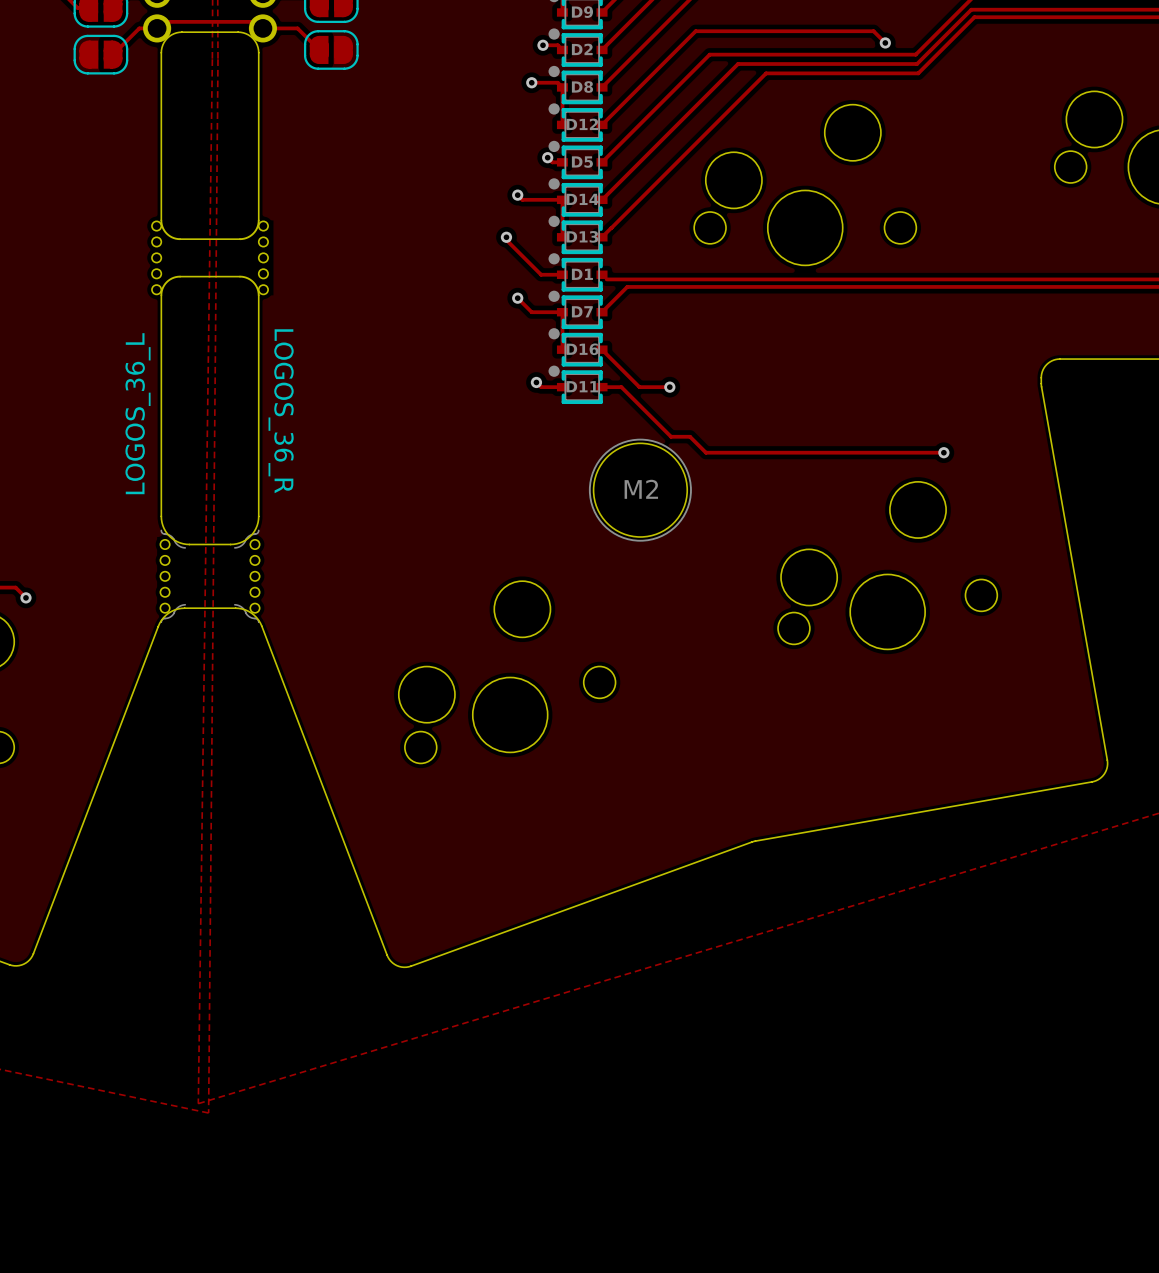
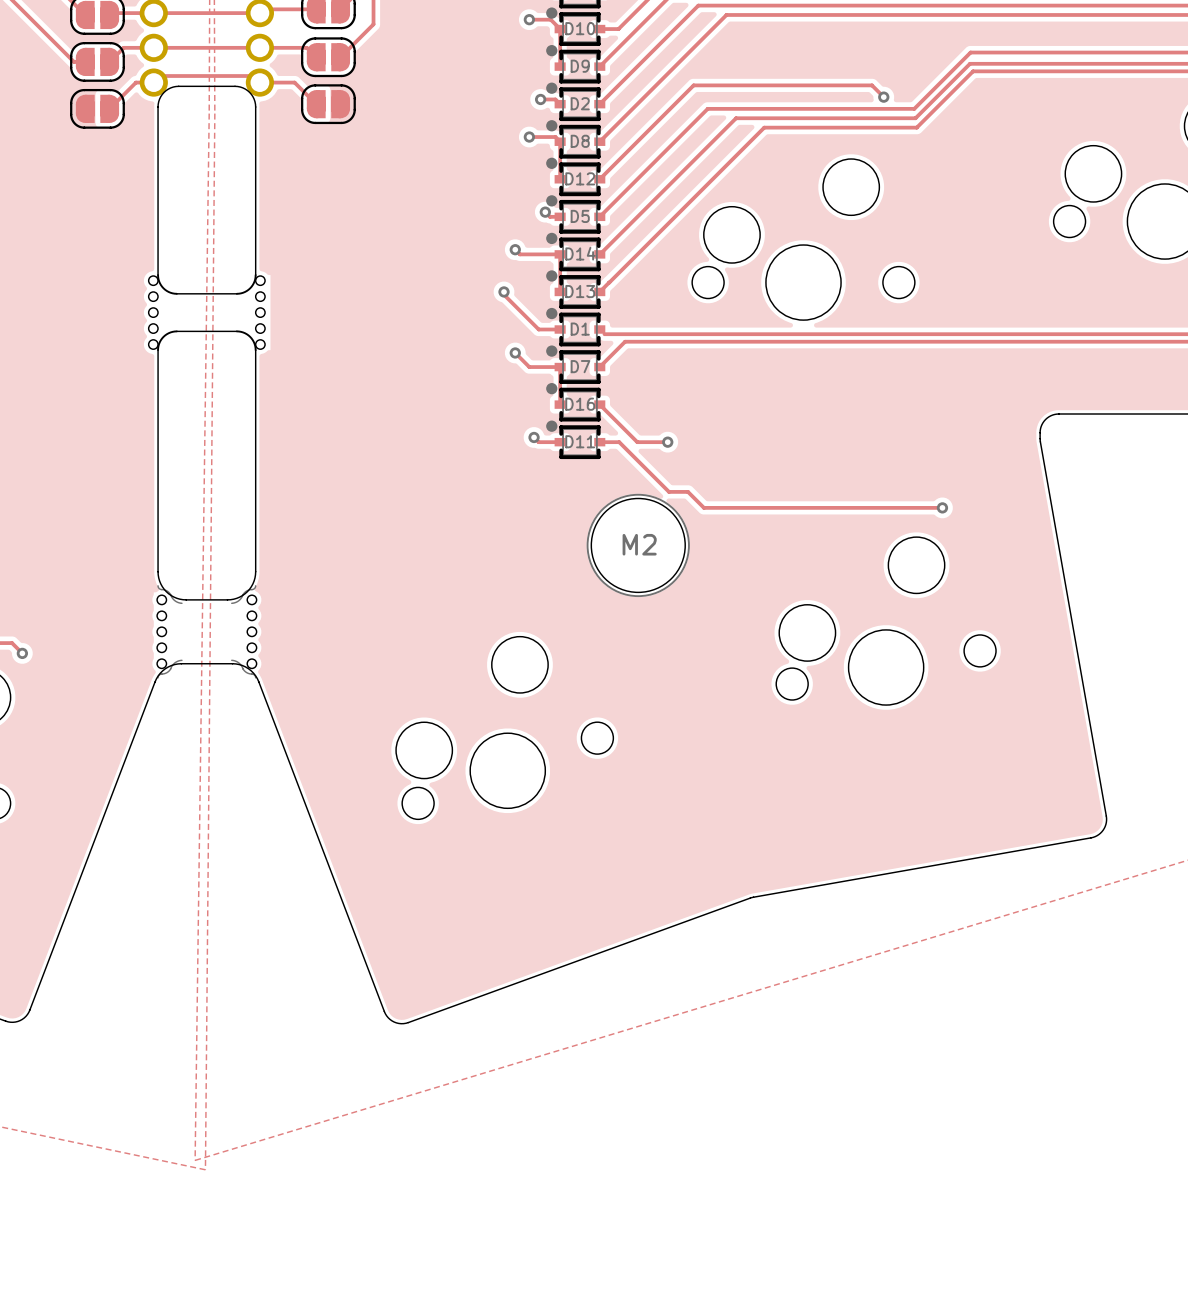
text: LOGOS_36_R (281, 411) -> none
text: LOGOS_36_L (138, 413) -> none

